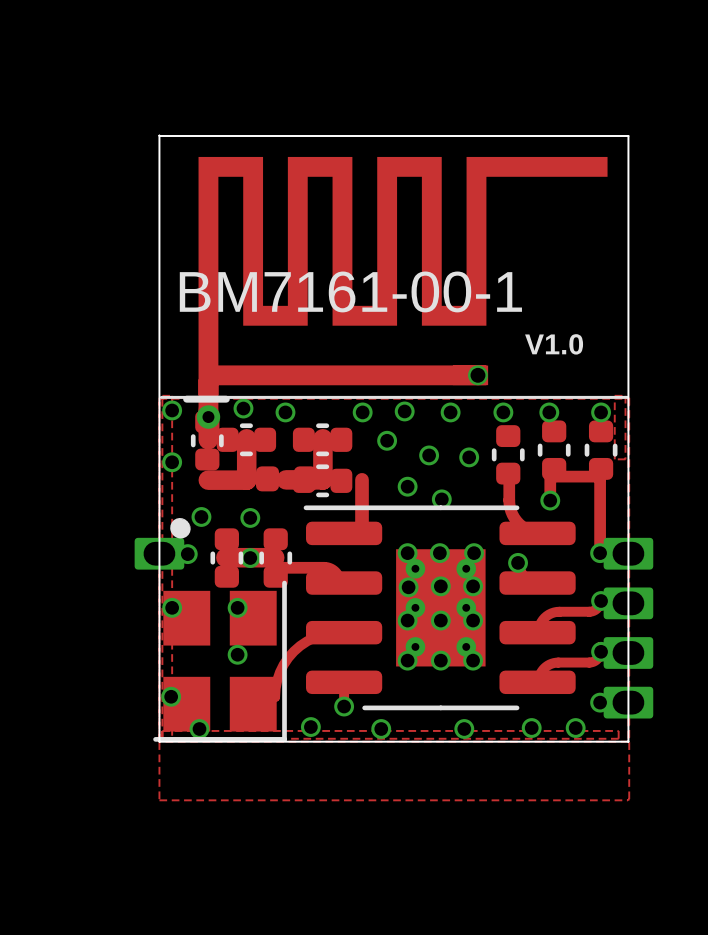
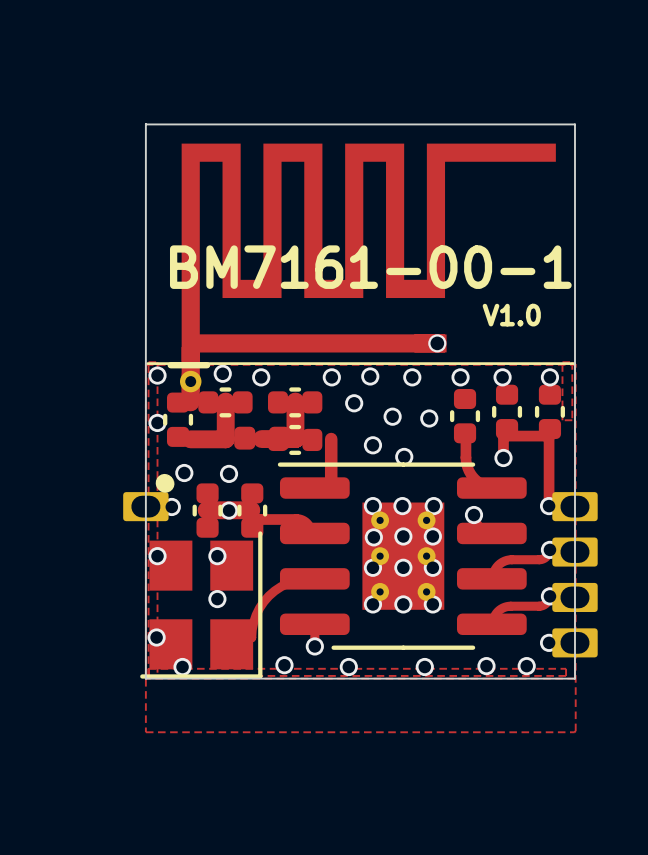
part position: (207, 440) -> (178, 419)

